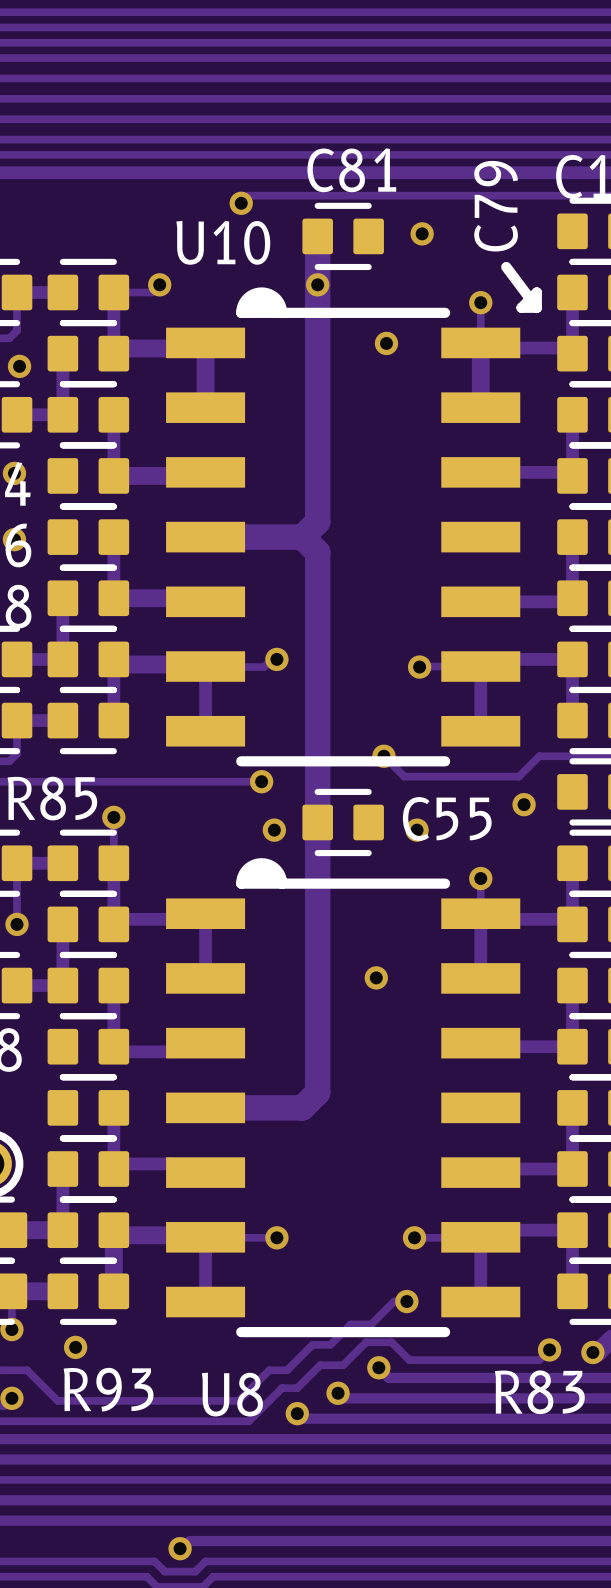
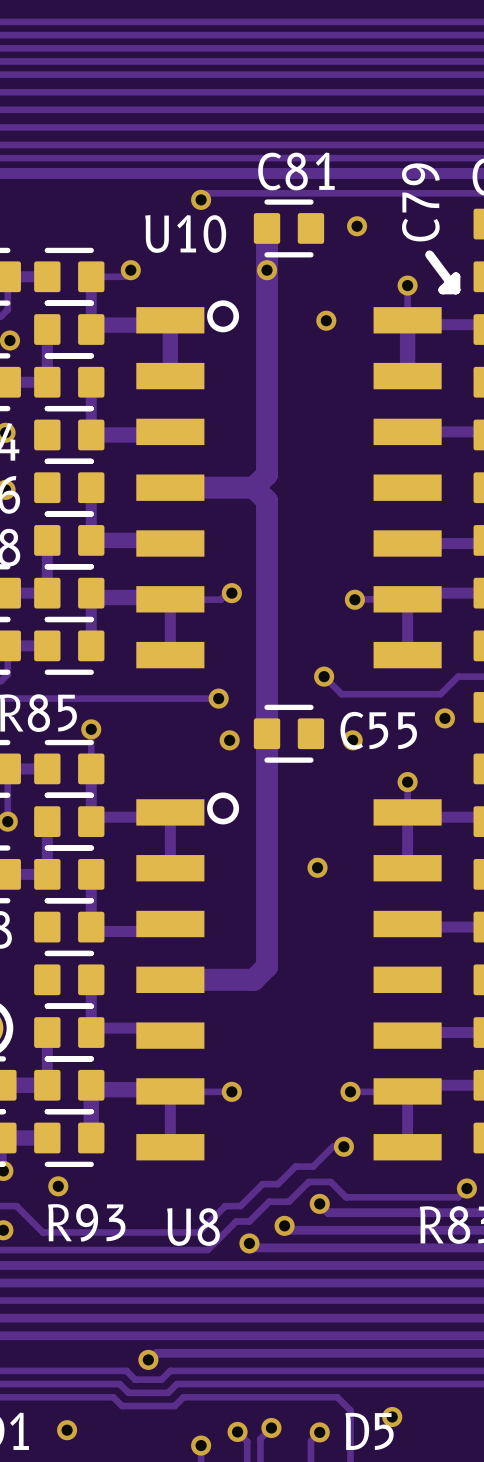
U10 footprint: [166, 287, 521, 767] -> [136, 300, 442, 669]
U8 footprint: [166, 858, 521, 1338] -> [136, 792, 442, 1161]

